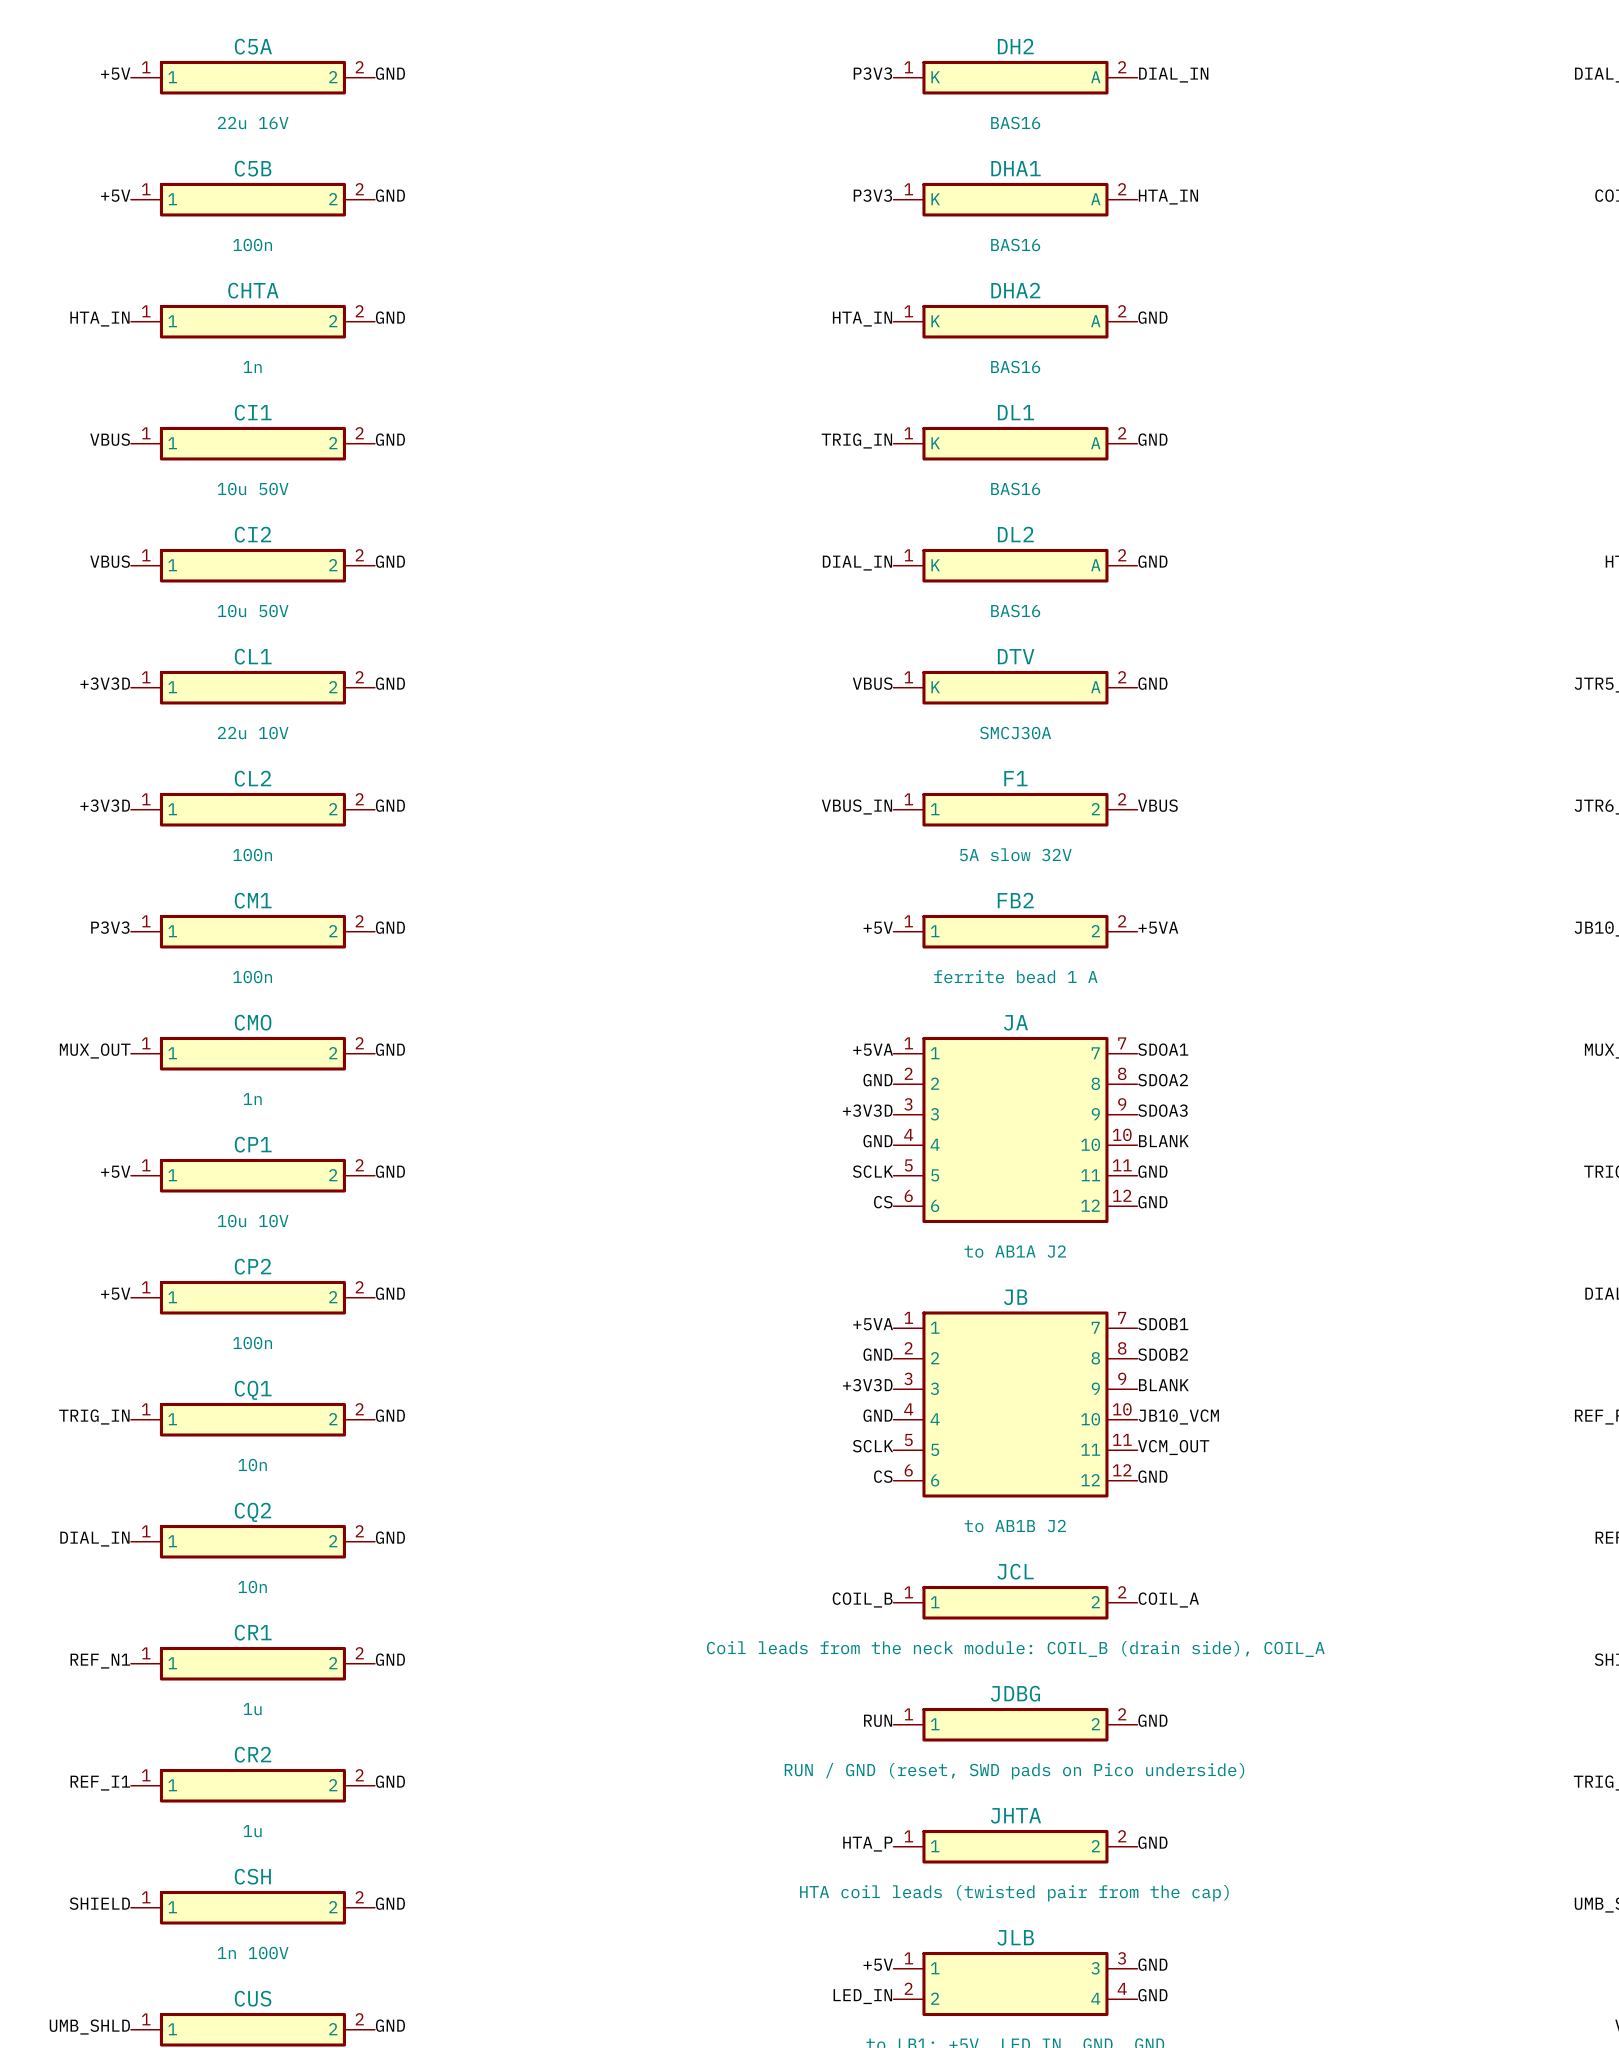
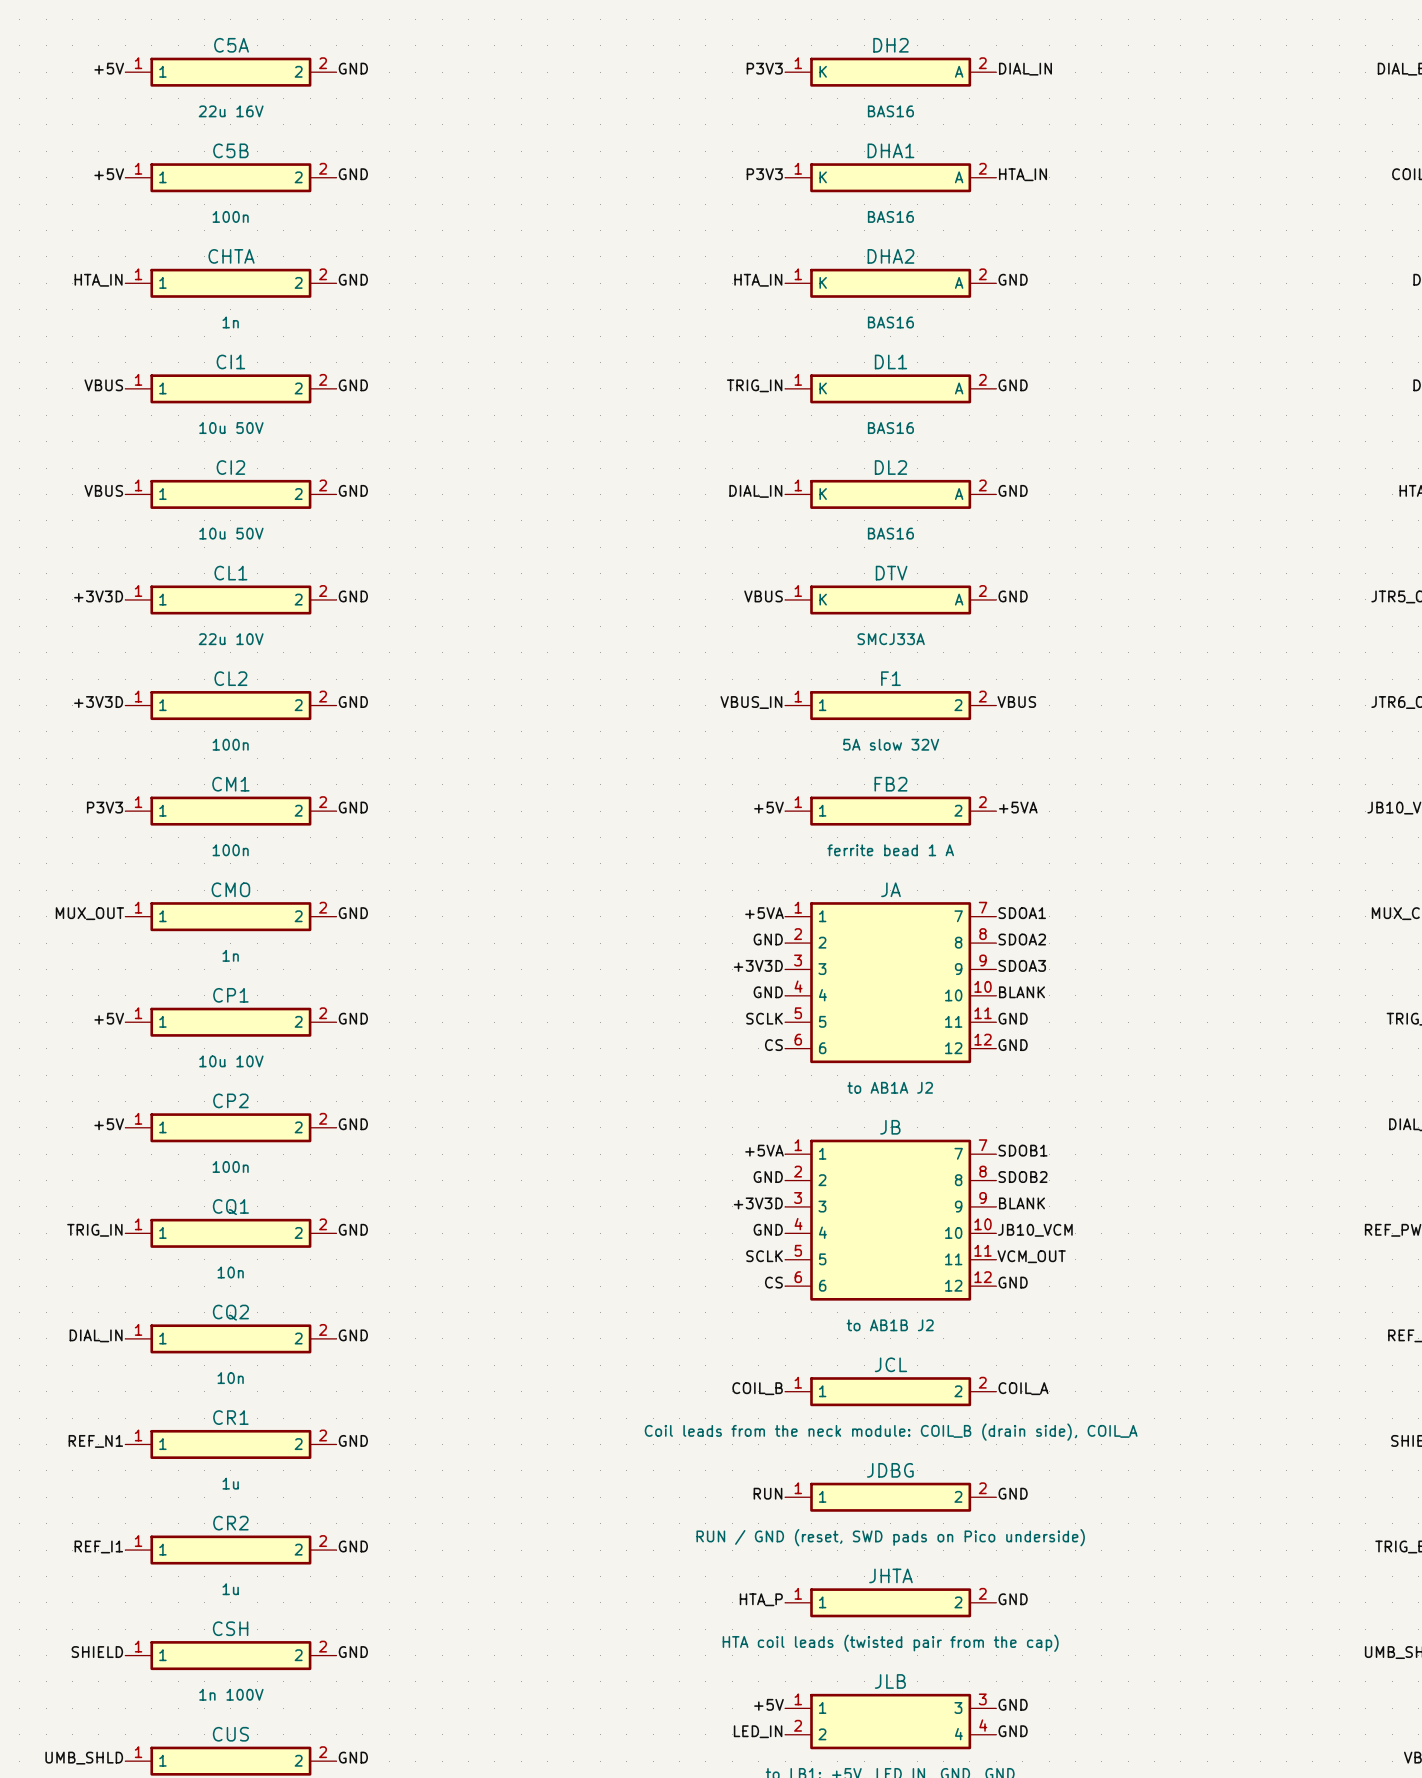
DTV value: SMCJ30A (1015, 733) -> SMCJ33A (891, 639)

